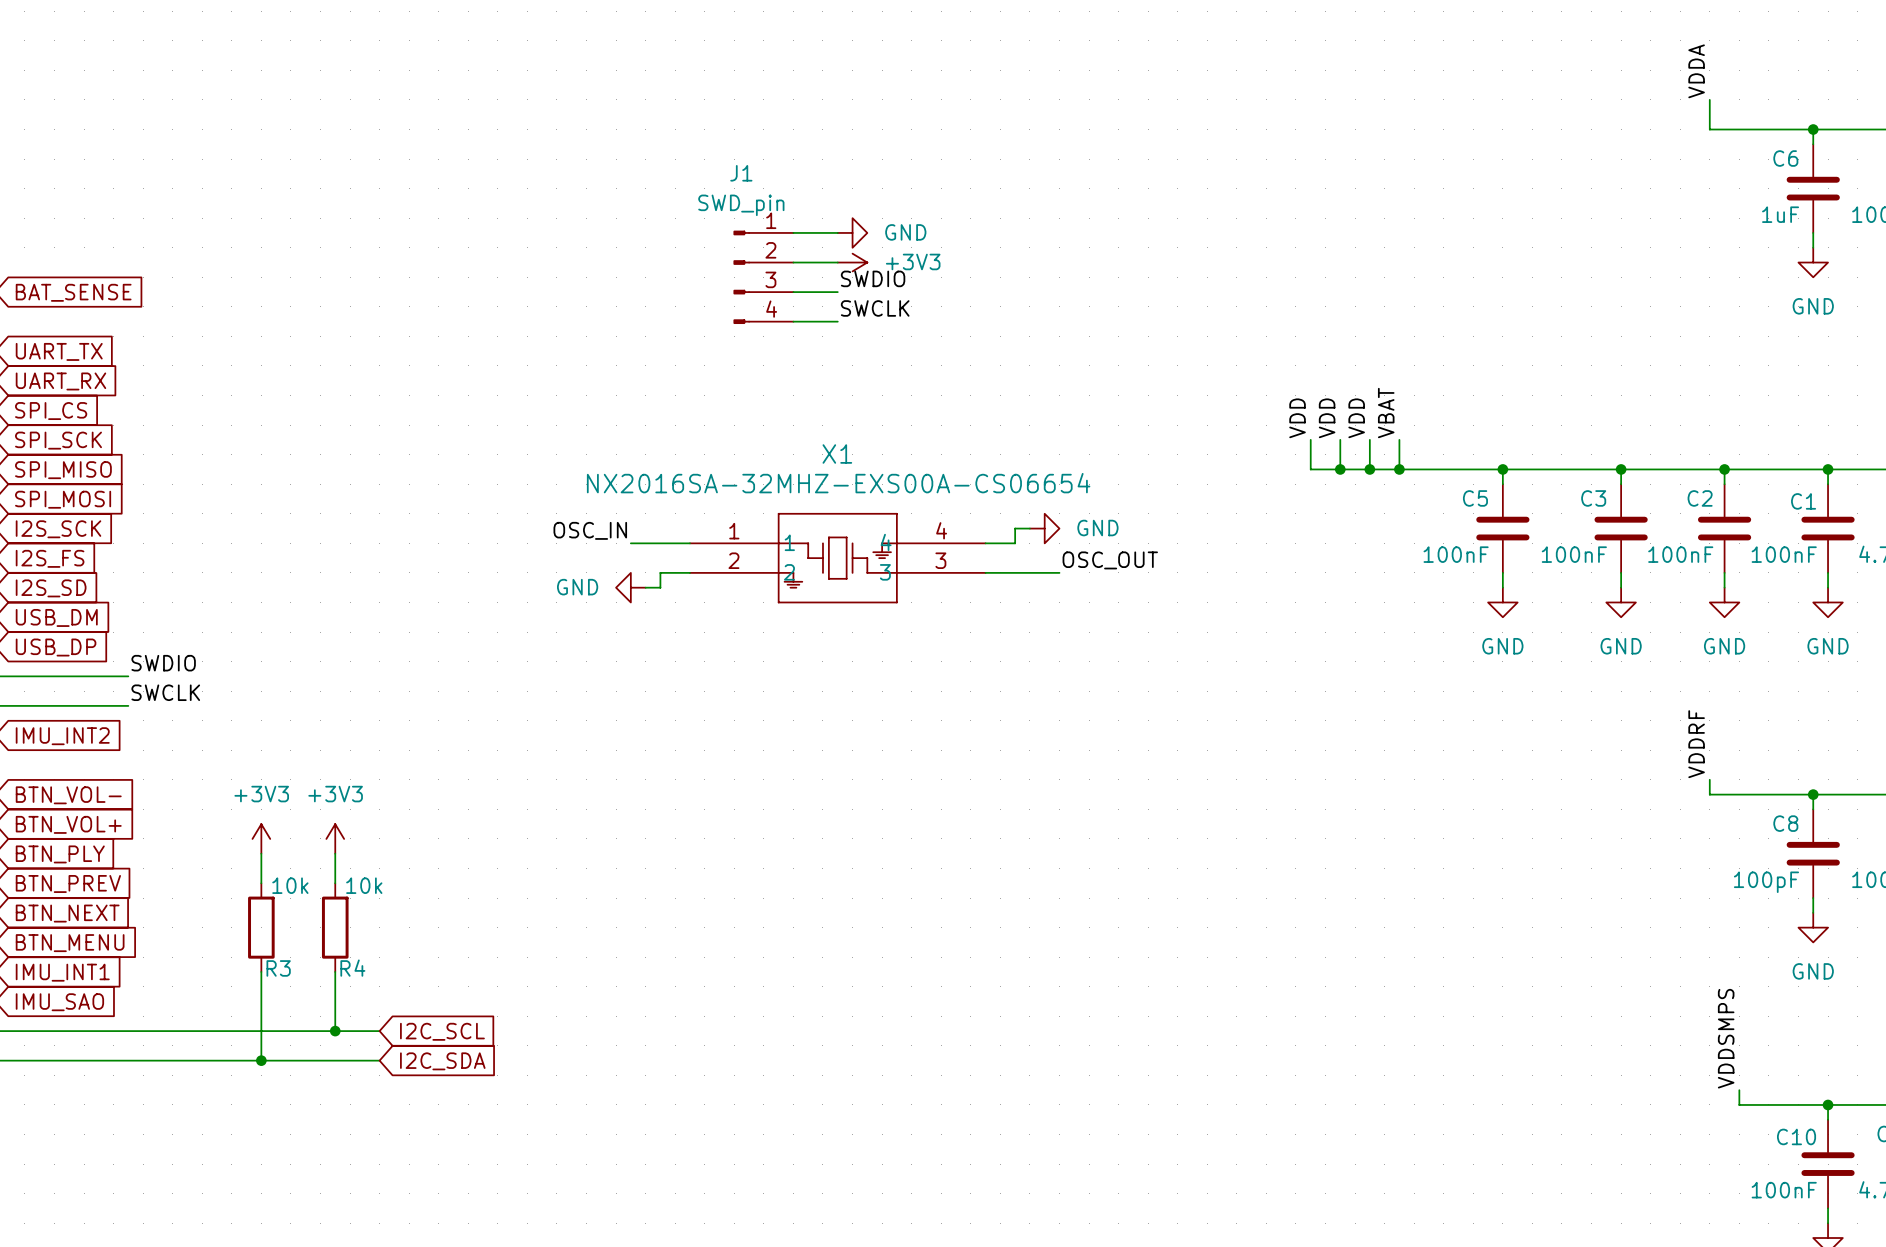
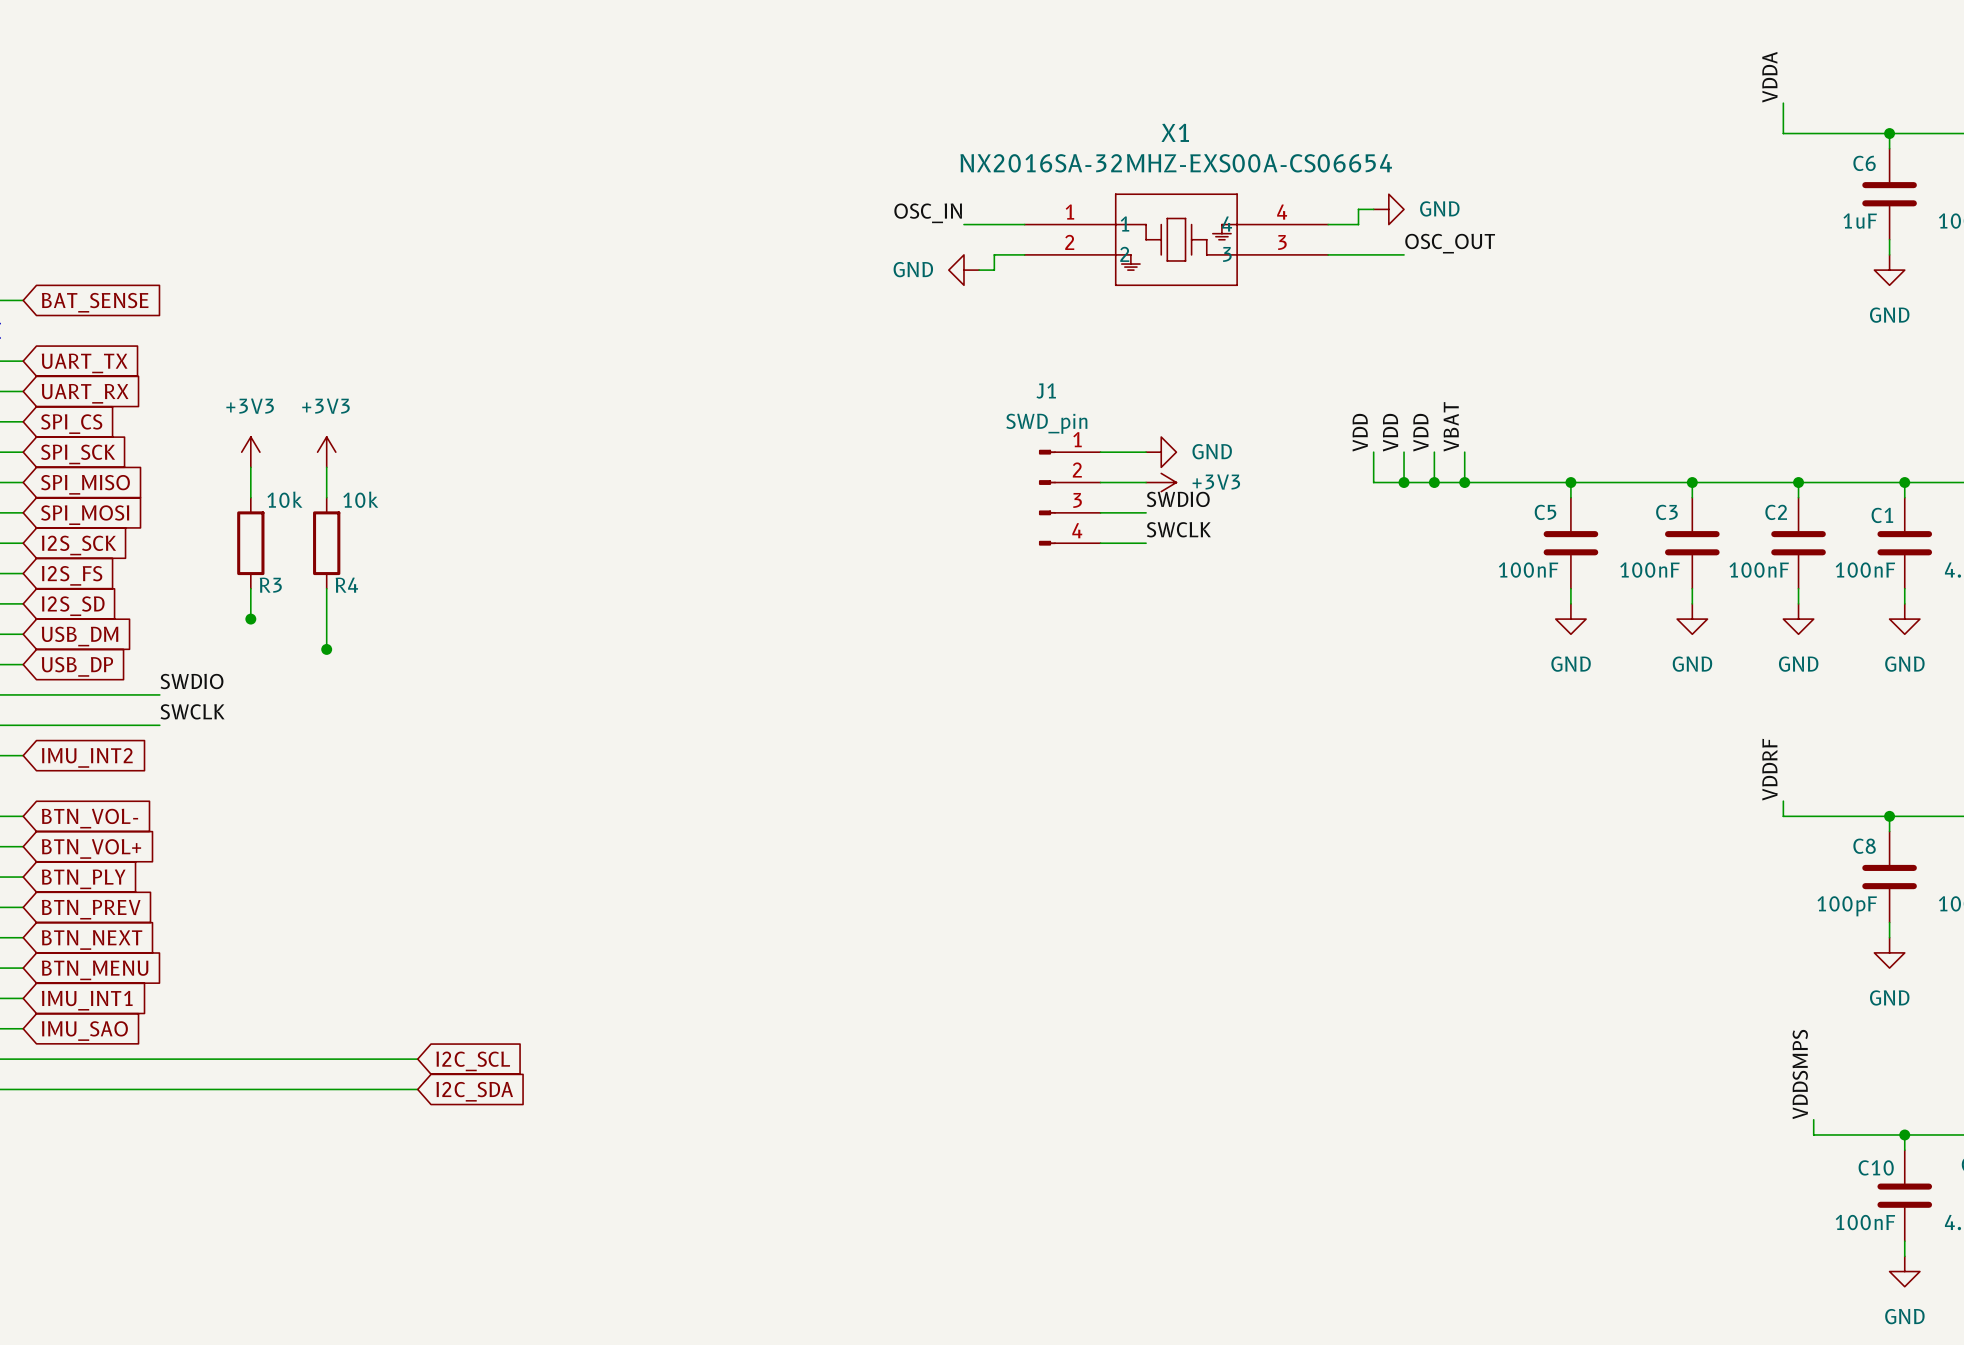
wire: none -> (1373, 209) (1358, 209) (1358, 224) (1328, 224)
power symbol: none -> GND (1388, 209)
label: none -> OSC_IN (928, 213)
wire: none -> (963, 224) (1024, 224)
wire: (793, 232) (837, 232) -> none
power symbol rotation: 0° (852, 232) -> 180° (963, 270)
power symbol position: GND (852, 232) -> GND (963, 270)
label: none -> OSC_OUT (1450, 243)
wire: none -> (1024, 254) (994, 254) (994, 270) (979, 270)
wire: none -> (1328, 254) (1404, 254)
wire: (793, 262) (837, 262) -> none
power symbol: +3V3 (852, 262) -> none
J1 position: (763, 277) -> (1069, 497)
label: SWDIO (873, 278) -> none
wire: (793, 292) (837, 292) -> none
label: SWCLK (875, 308) -> none
wire: (793, 321) (837, 321) -> (1100, 452) (1146, 452)
power symbol: none -> +3V3 (250, 452)
power symbol: none -> +3V3 (326, 452)
wire: none -> (250, 467) (250, 497)
wire: none -> (326, 467) (326, 497)
wire: none -> (1100, 482) (1146, 482)
power symbol: none -> +3V3 (1161, 482)
label: none -> SWDIO (1178, 499)
wire: none -> (1100, 512) (1146, 512)
label: none -> SWCLK (1178, 529)
wire: (1029, 528) (1015, 528) (1015, 543) (985, 543) -> none
wire: none -> (1100, 543) (1146, 543)
power symbol position: GND (1044, 528) -> GND (1161, 452)
label: OSC_IN (590, 530) -> none
wire: (630, 543) (689, 543) -> none
X1 position: (837, 558) -> (1176, 239)
label: OSC_OUT (1110, 560) -> none
wire: none -> (326, 588) (326, 649)
wire: (689, 572) (660, 572) (660, 587) (645, 587) -> none
wire: (985, 572) (1059, 572) -> none
power symbol: GND (630, 587) -> none
junction: none -> (250, 619)
junction: none -> (326, 649)
power symbol: +3V3 (261, 838) -> none
power symbol: +3V3 (335, 838) -> none
wire: (261, 853) (261, 883) -> (250, 588) (250, 619)
wire: (335, 853) (335, 883) -> none
R3 position: (261, 927) -> (250, 543)
R4 position: (335, 927) -> (326, 543)
wire: (261, 971) (261, 1060) -> none
wire: (335, 971) (335, 1031) -> none
junction: (335, 1031) -> none
junction: (261, 1060) -> none

